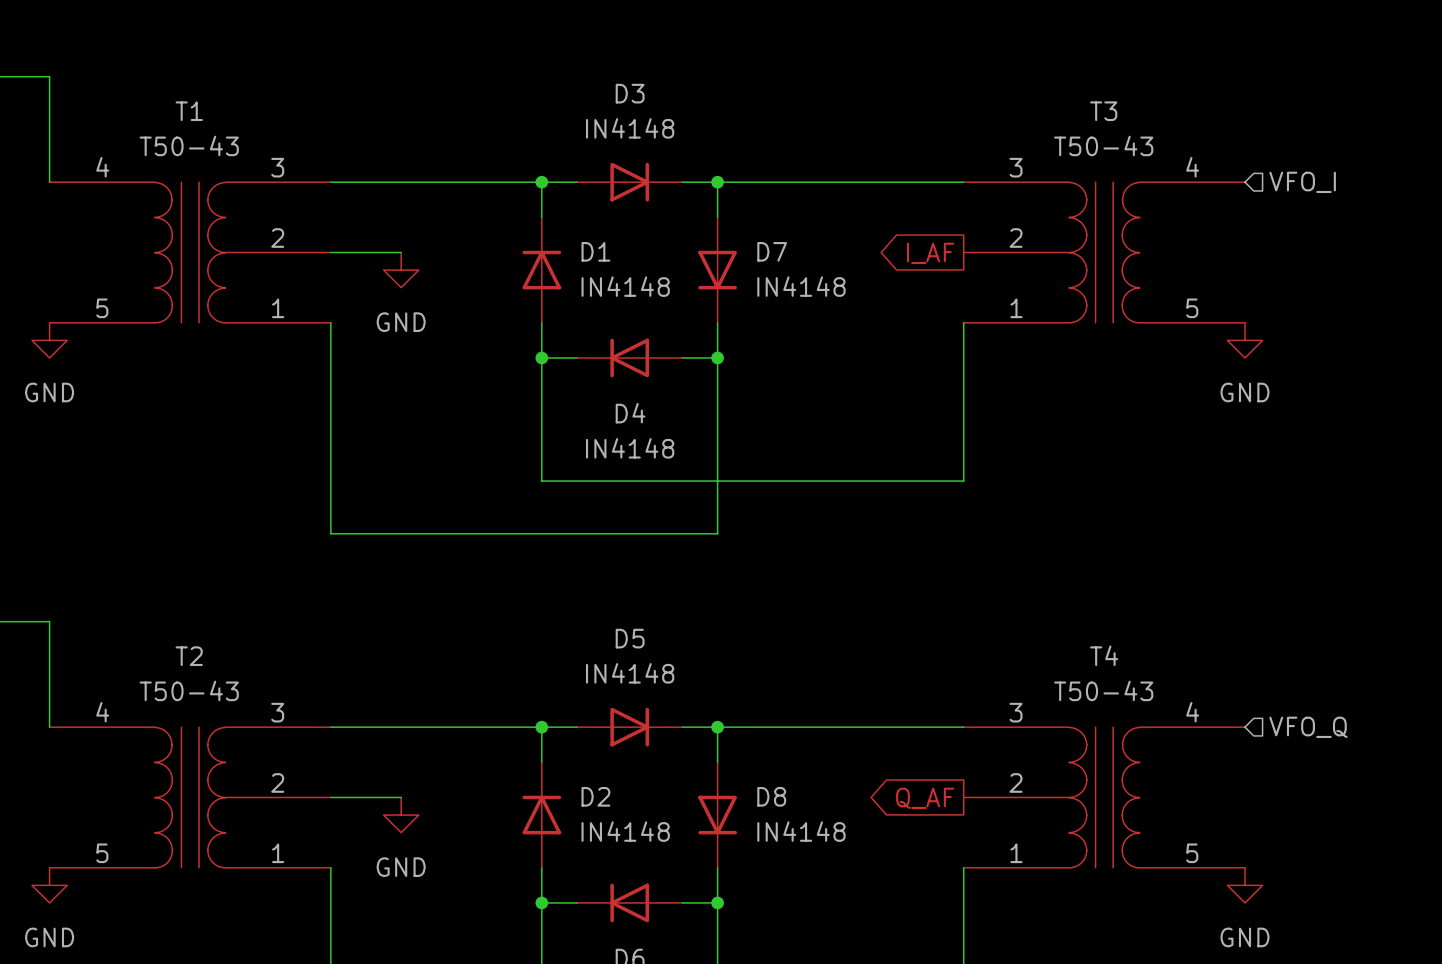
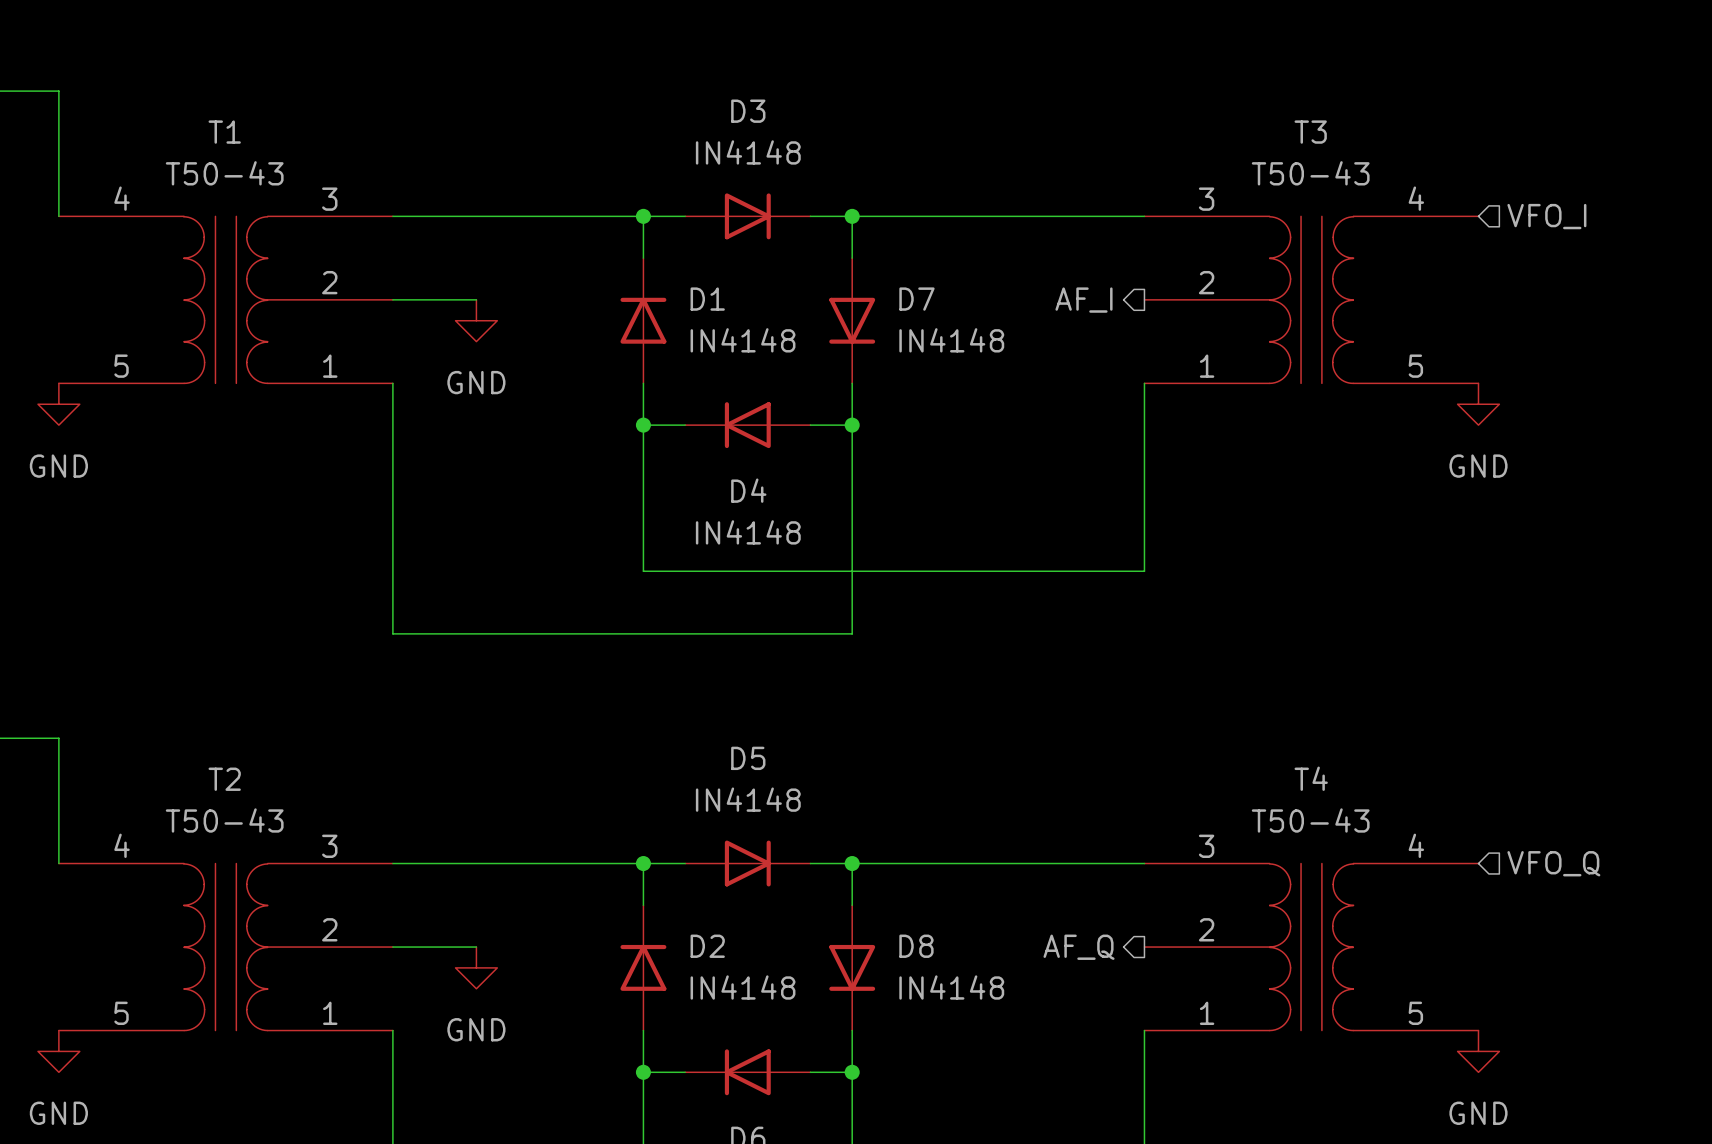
hierarchical label: none -> AF_I (1083, 300)
global label: I_AF (930, 253) -> none
hierarchical label: none -> AF_Q (1079, 947)
global label: Q_AF (925, 798) -> none

